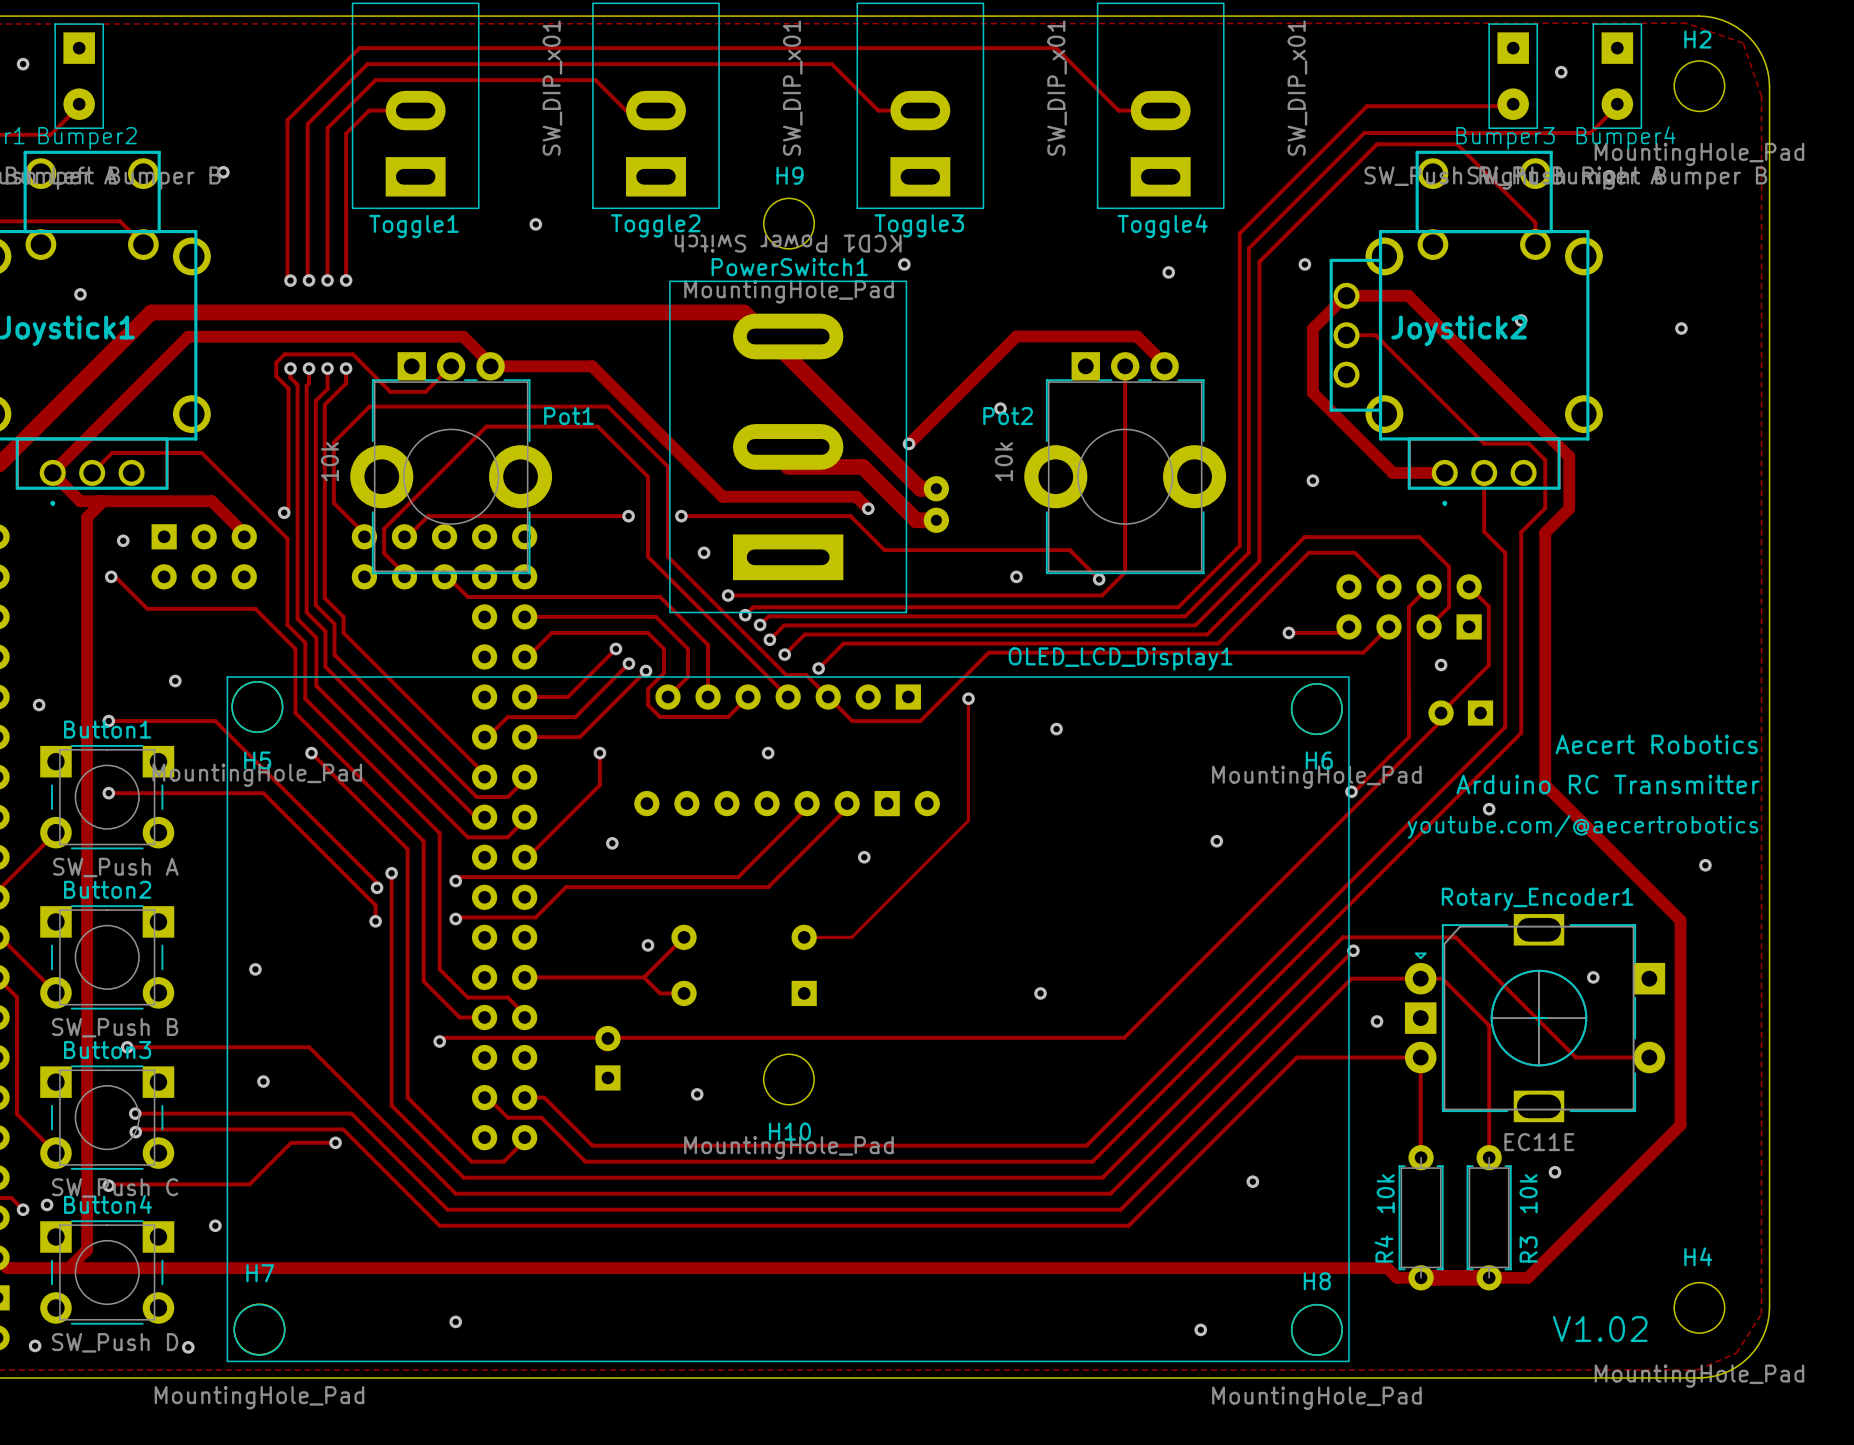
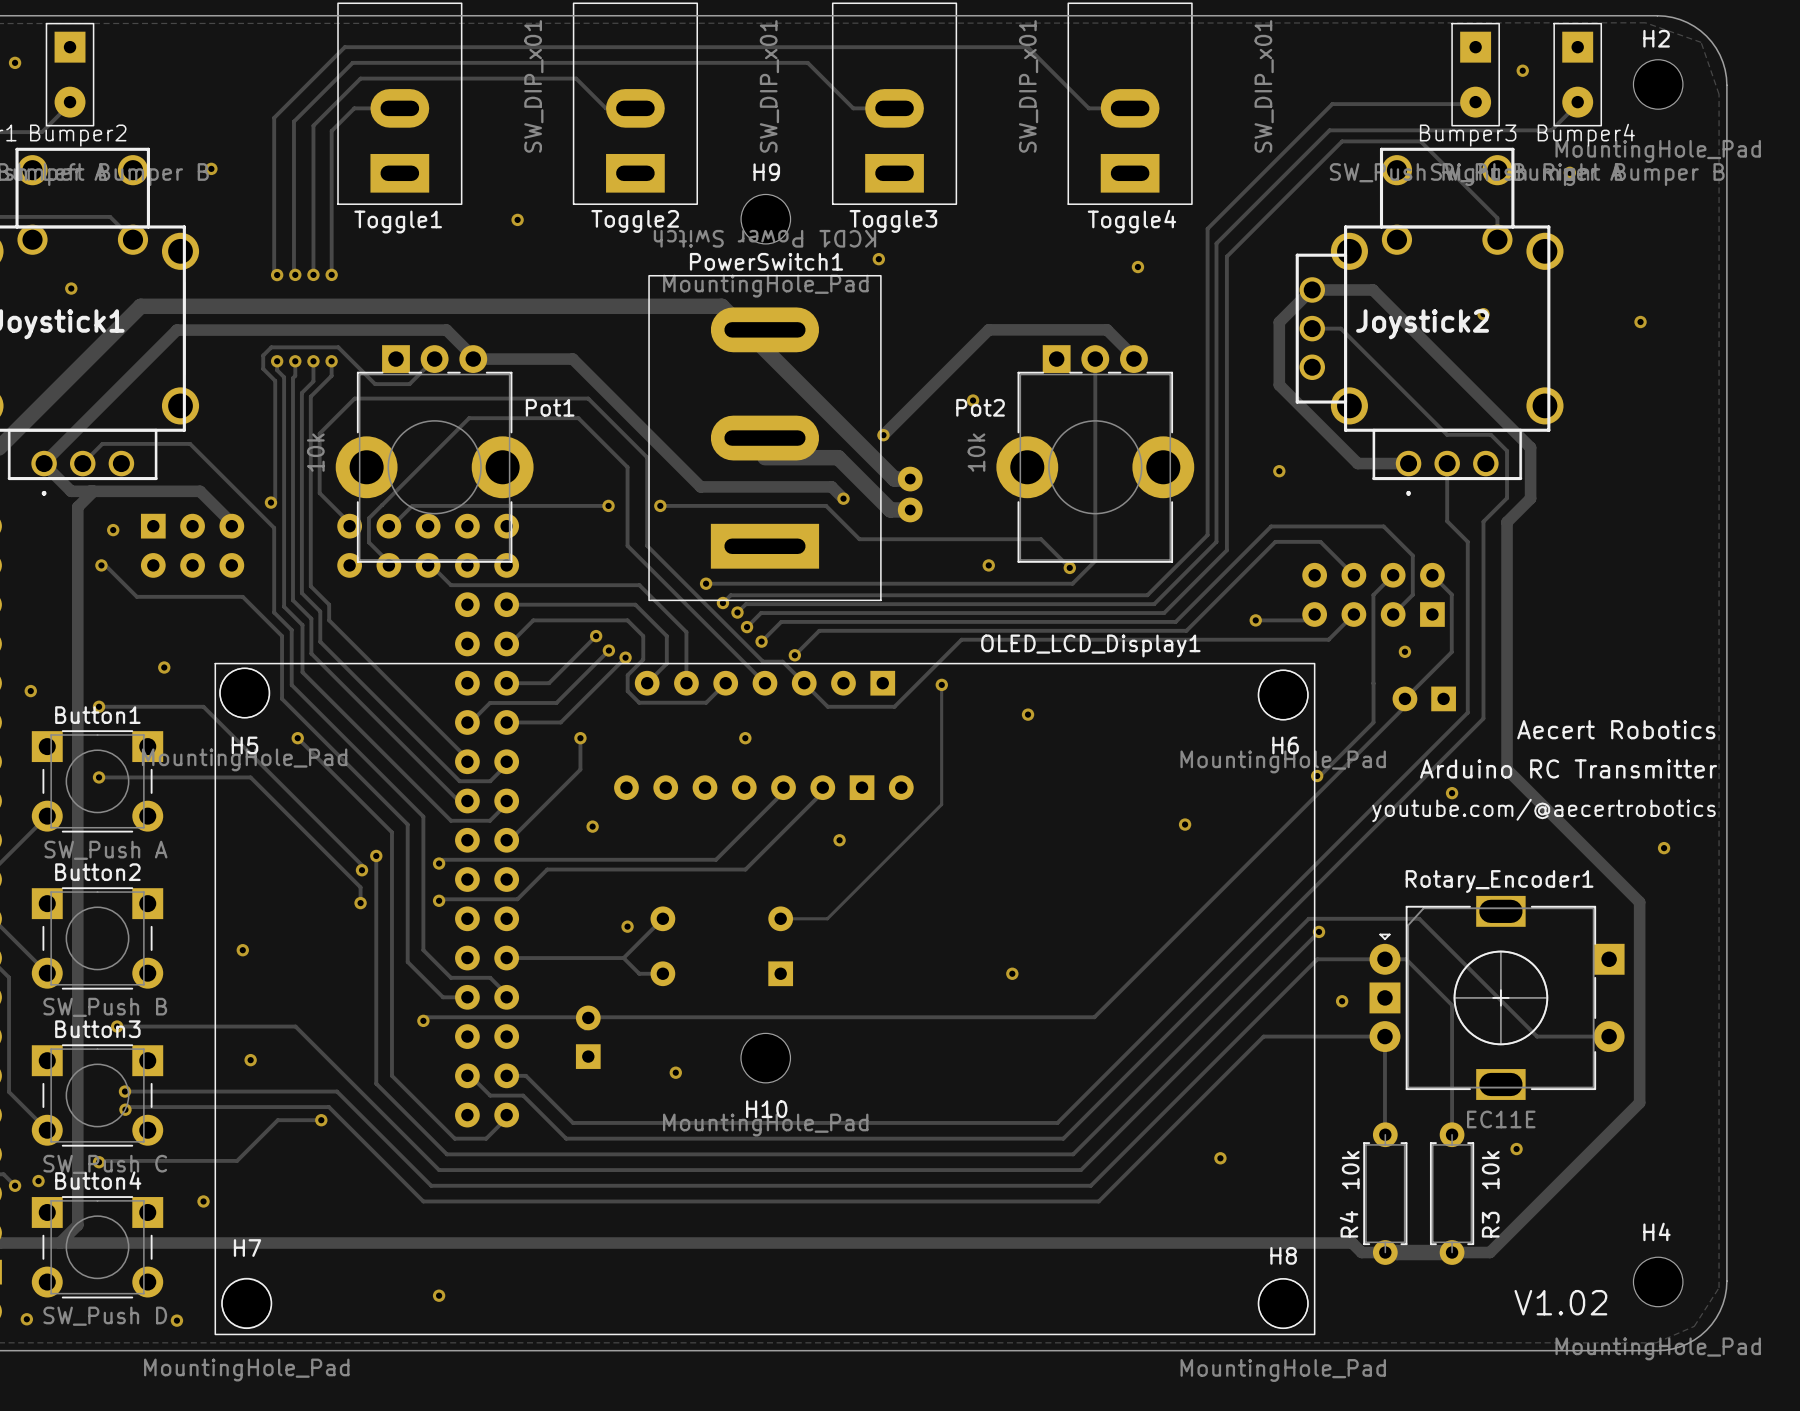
via: (1304, 264) -> none
via: (704, 552) -> none
via: (1593, 977) -> none
via: (1200, 1329) -> none

